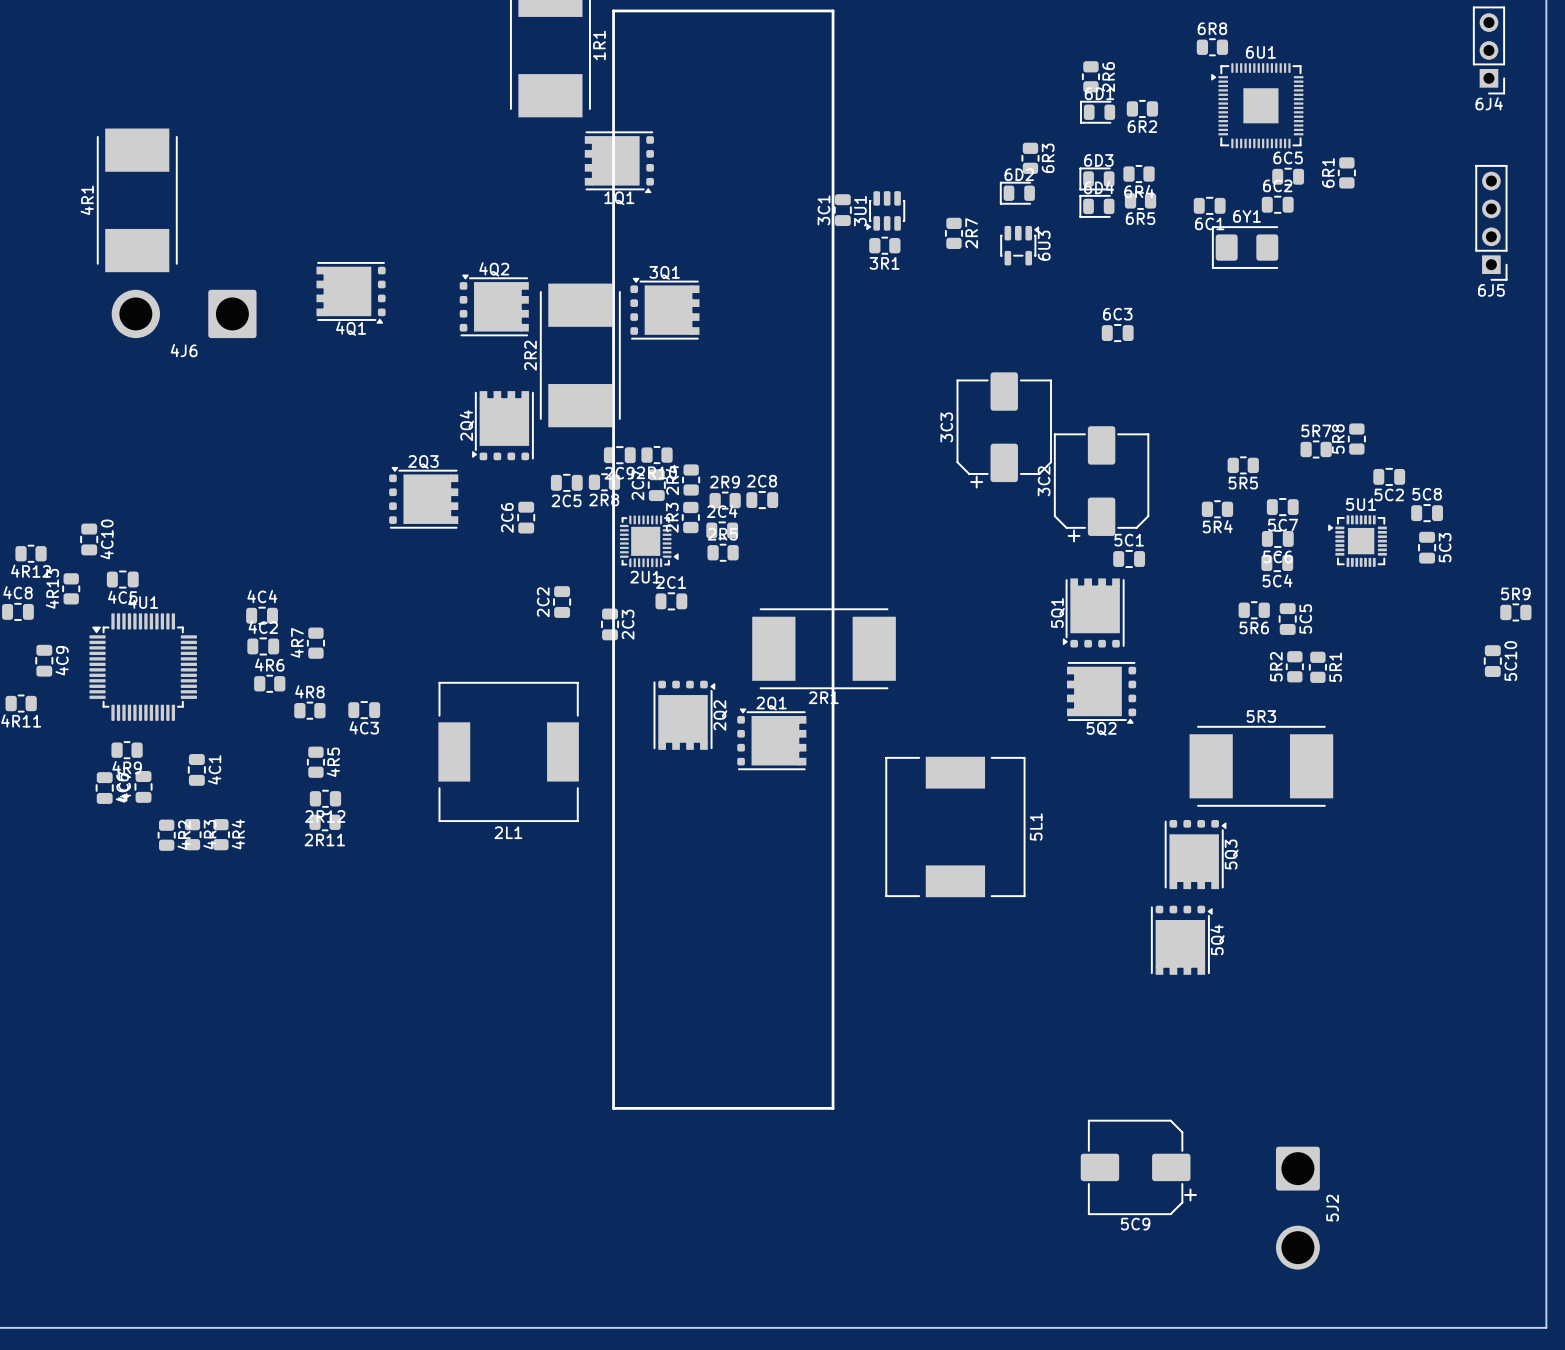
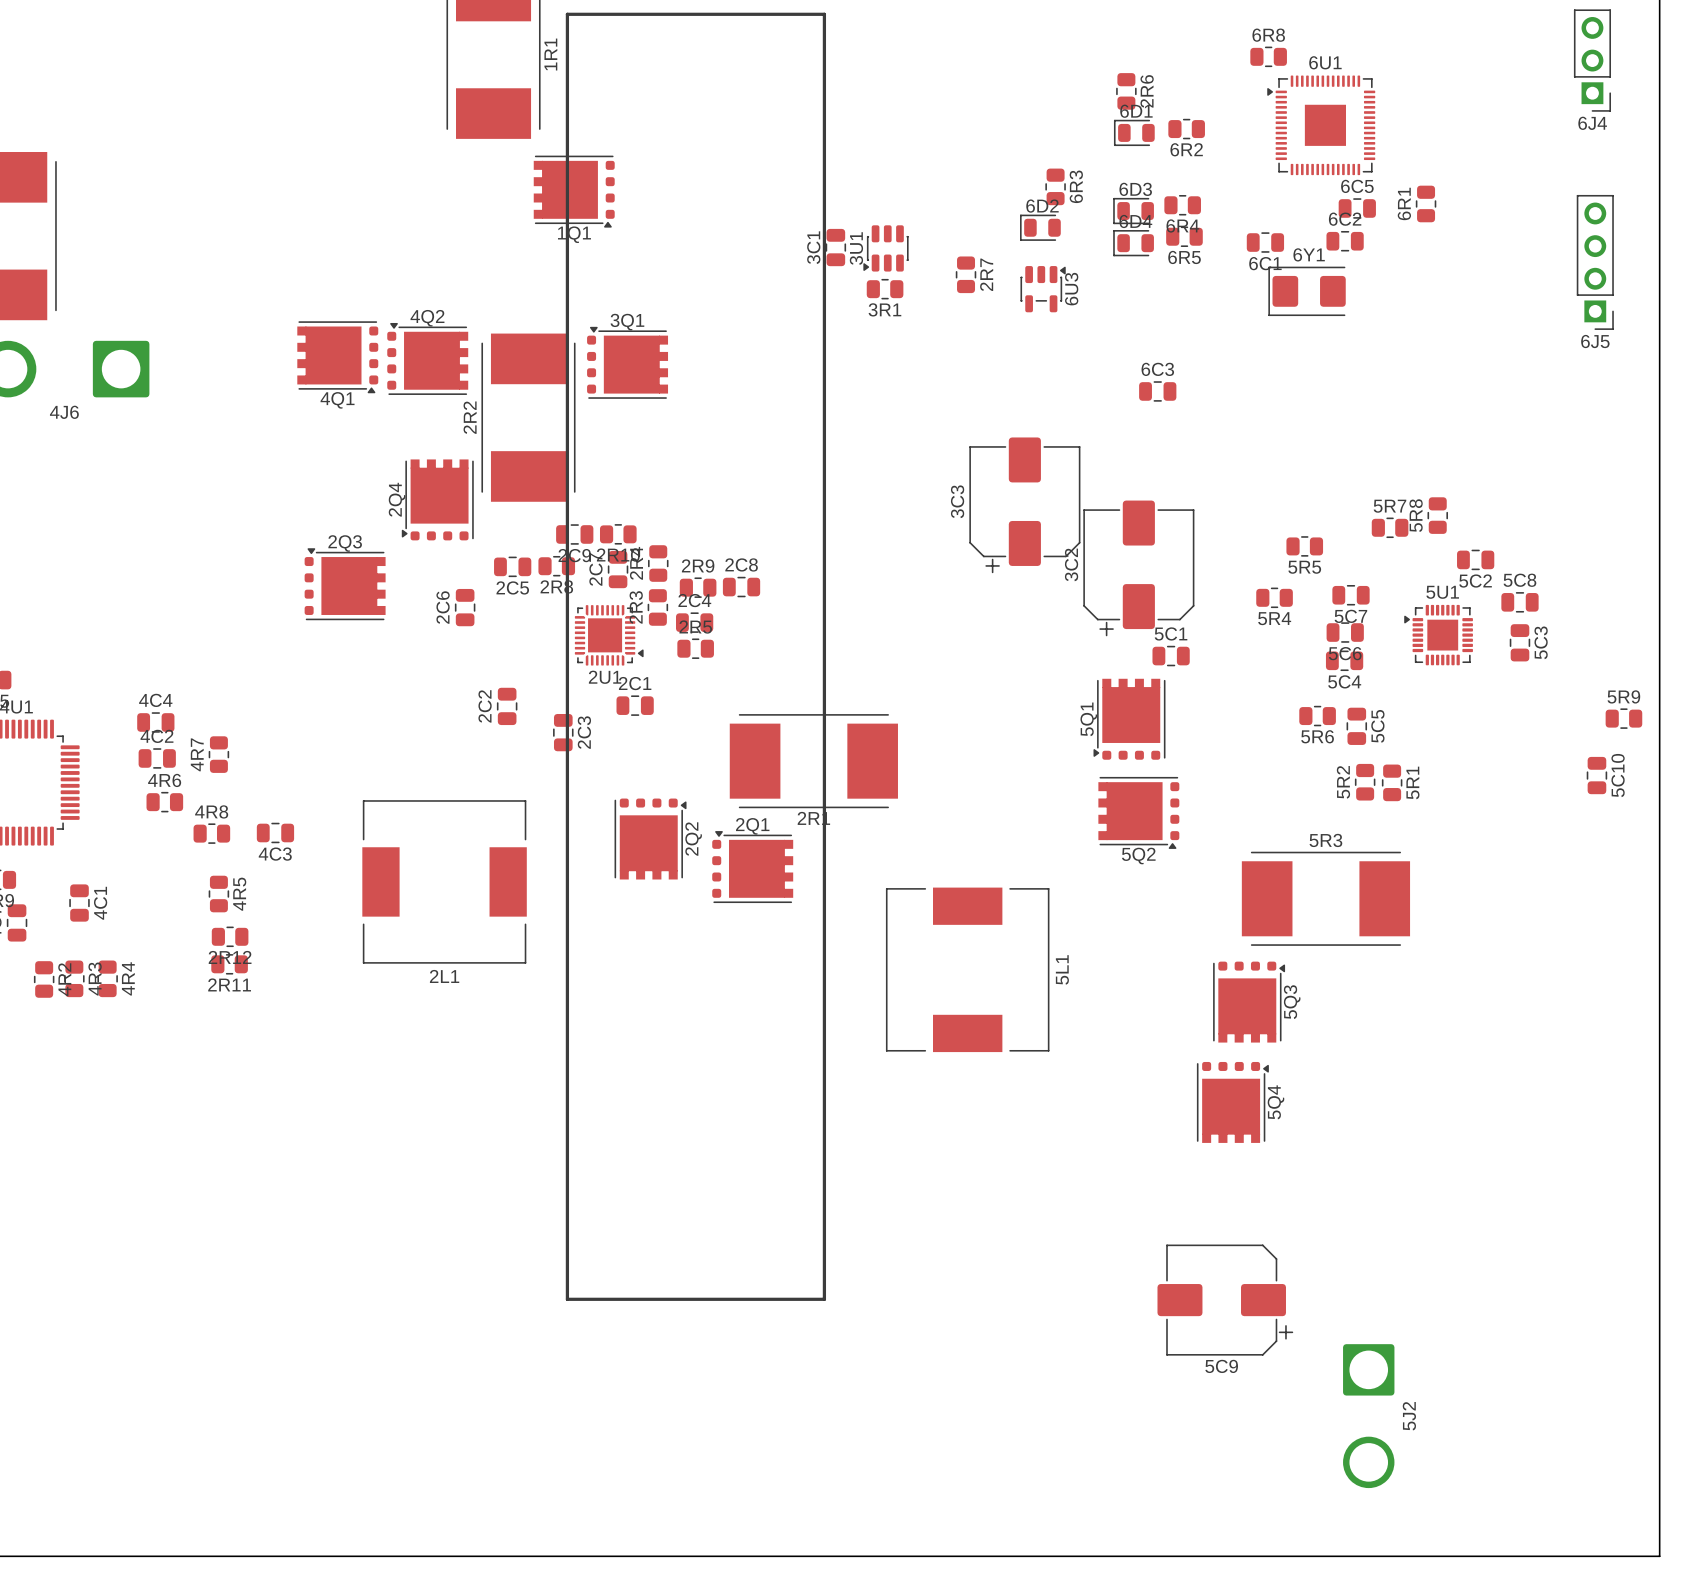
4Q1 position: (351, 292) -> (337, 357)
5C9 position: (1138, 1167) -> (1225, 1300)

